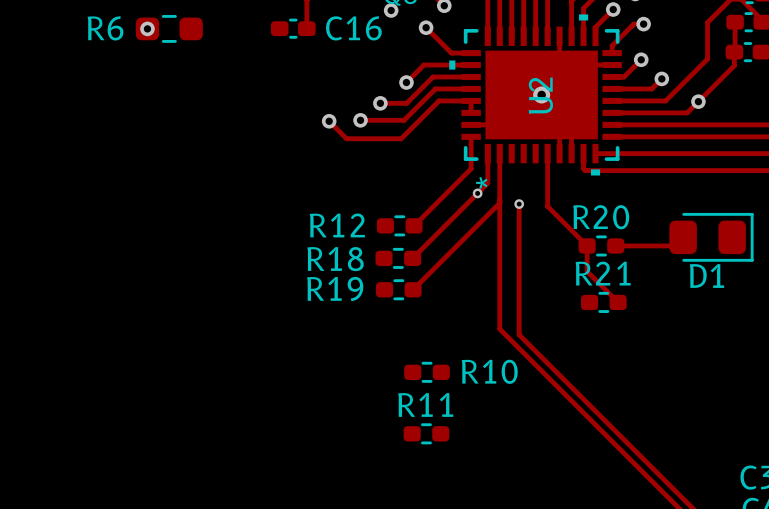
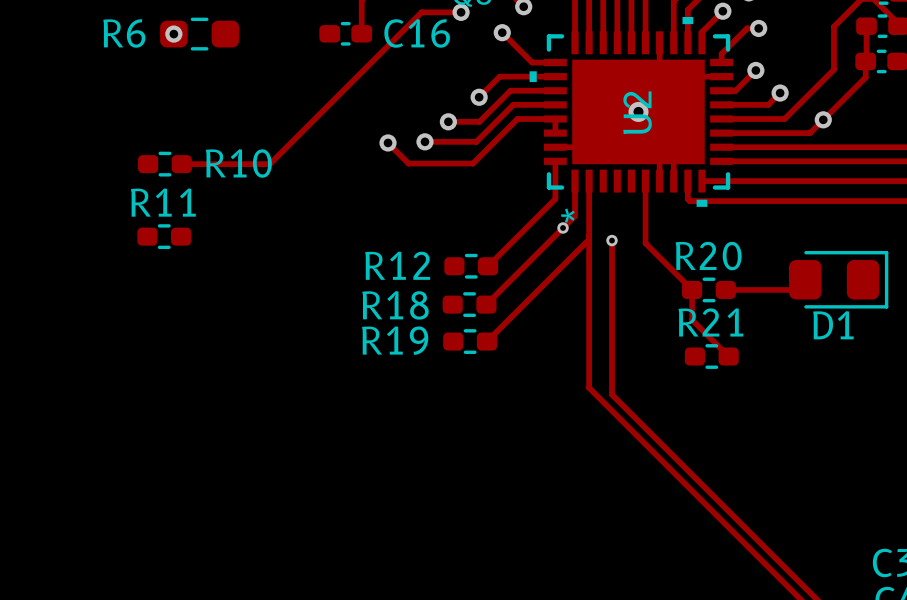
track: none -> (461, 12) (421, 12) (269, 164) (181, 164)
R10 position: (427, 372) -> (164, 164)
R11 position: (426, 433) -> (164, 236)

